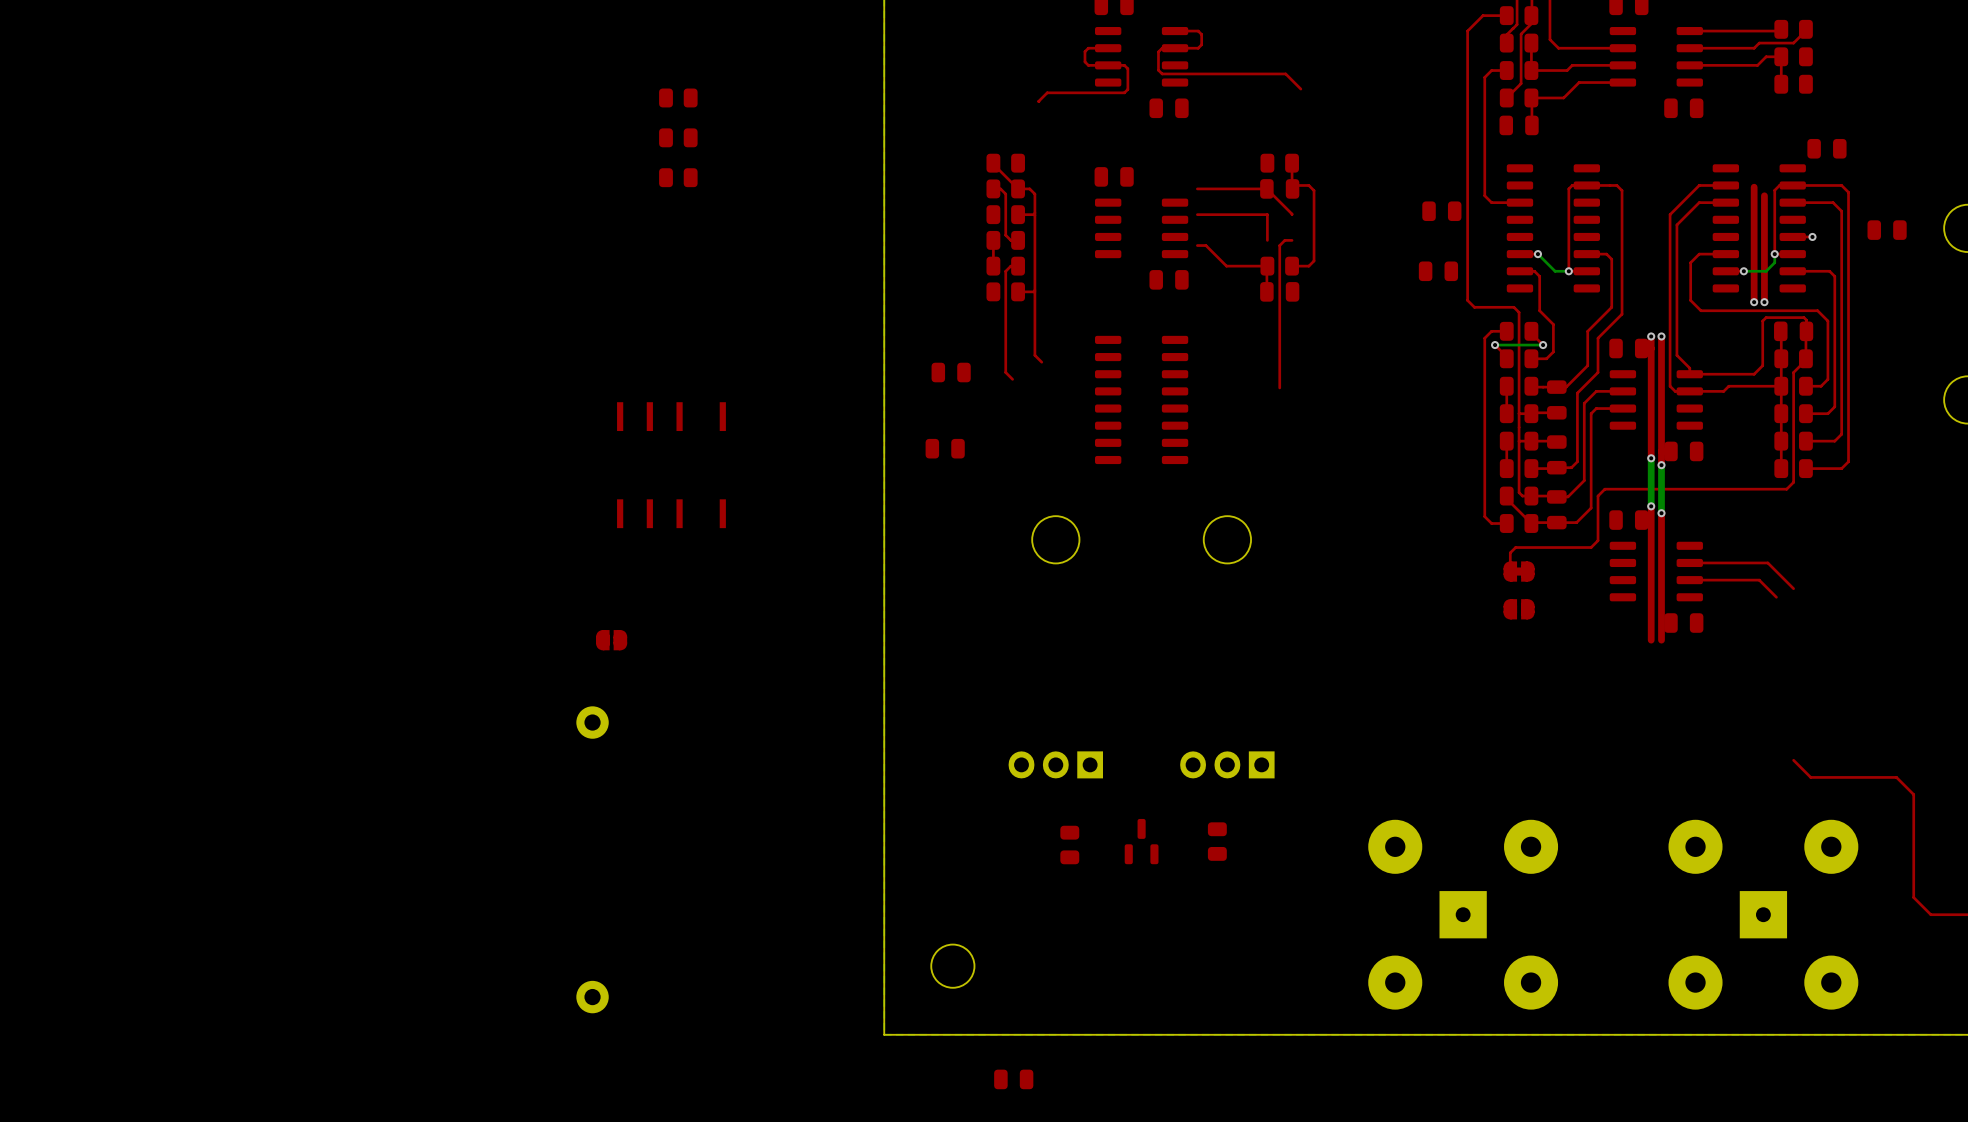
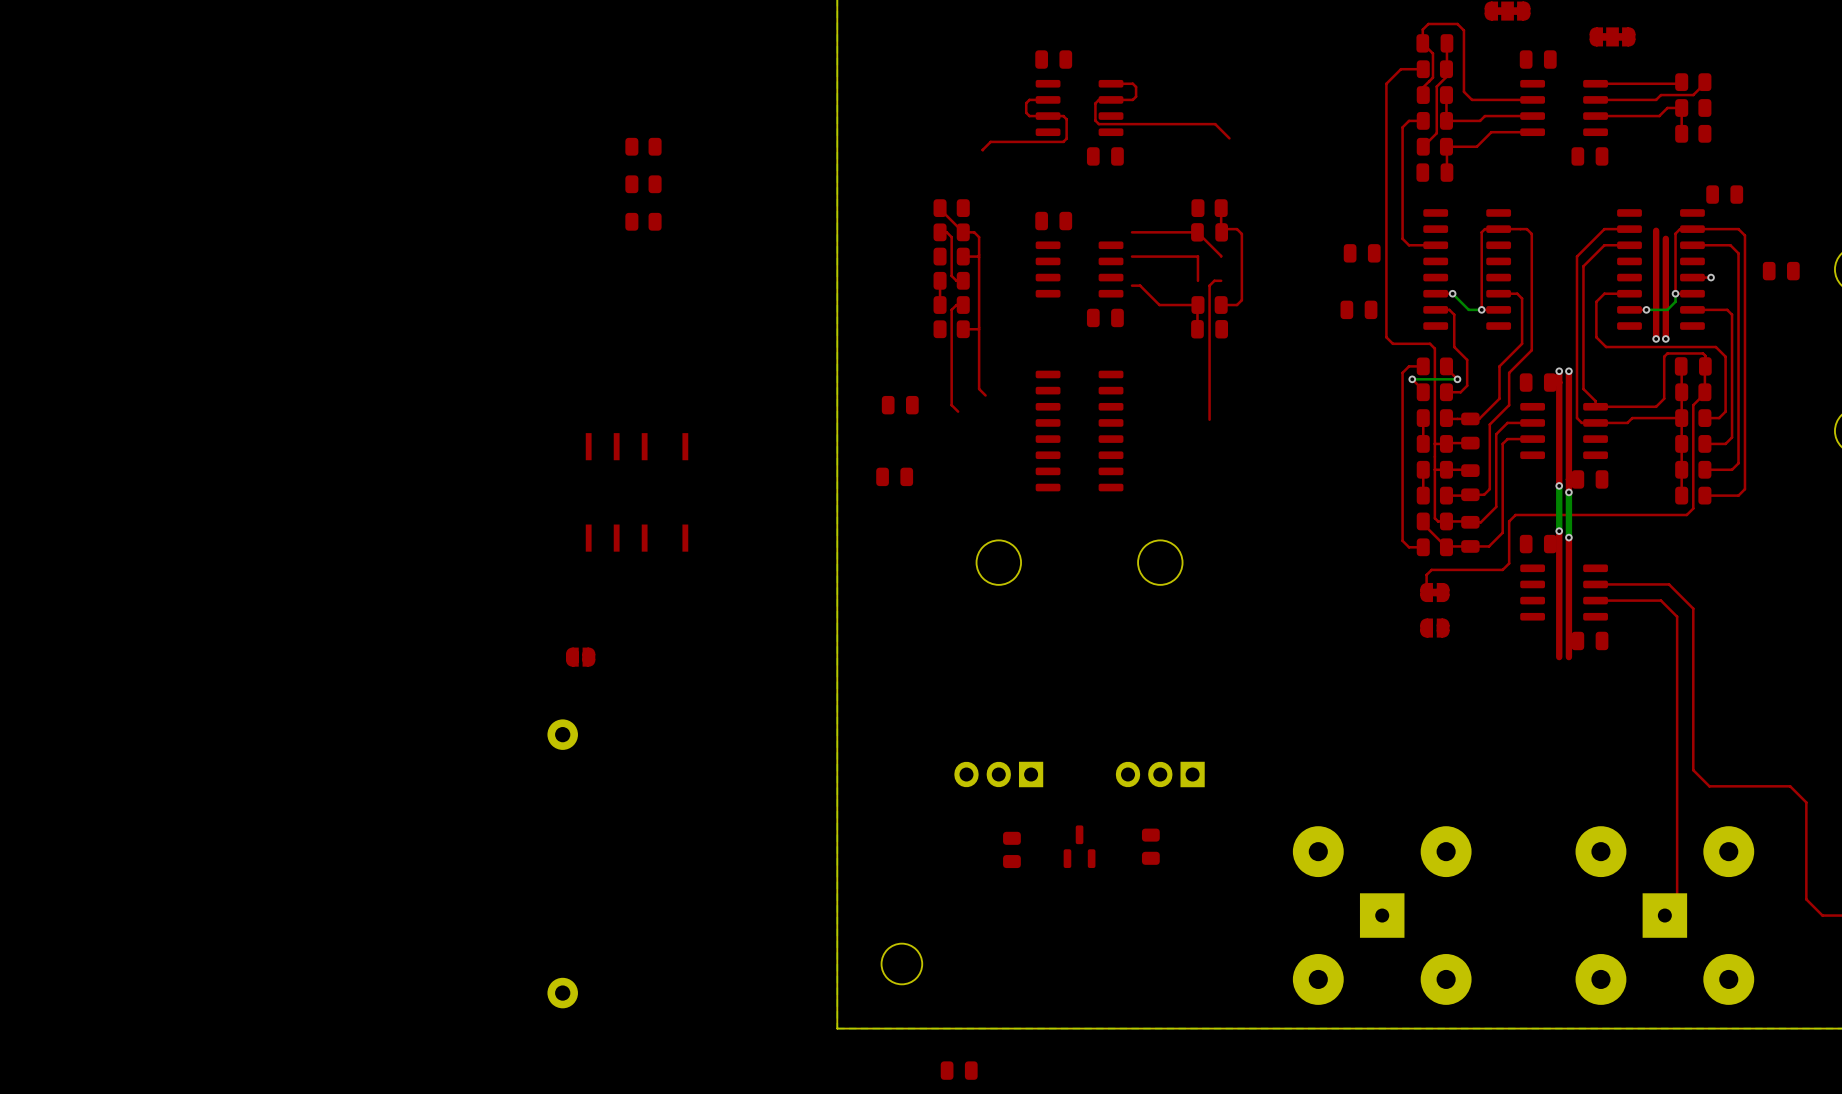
top track: none -> (1693, 608) (1693, 770)
top track: none -> (1677, 616) (1677, 903)

